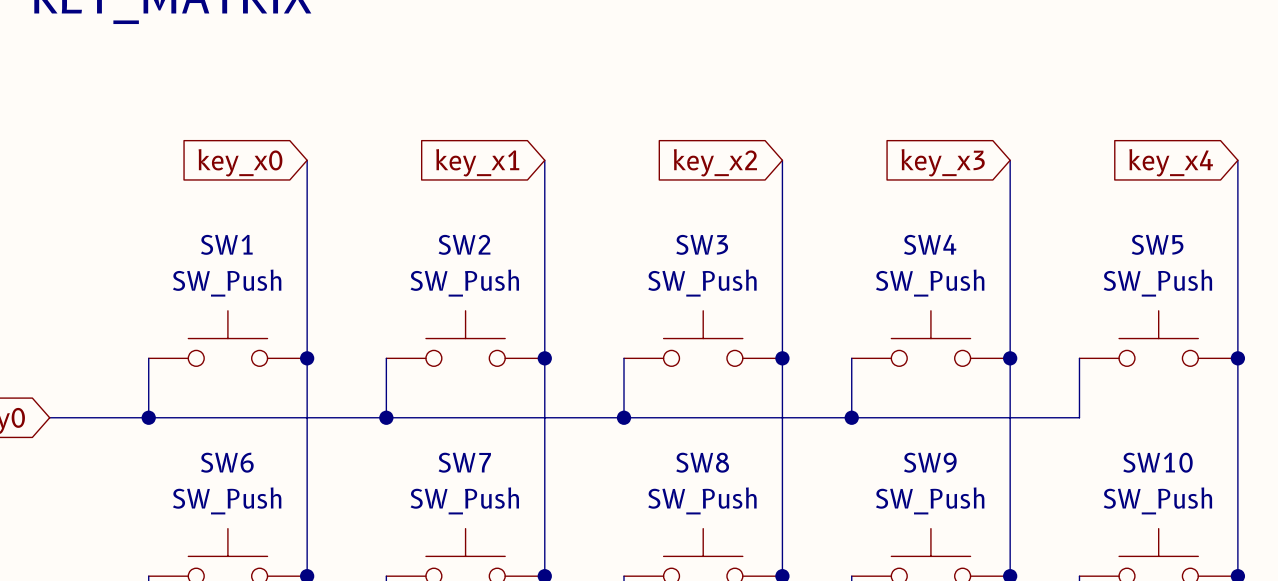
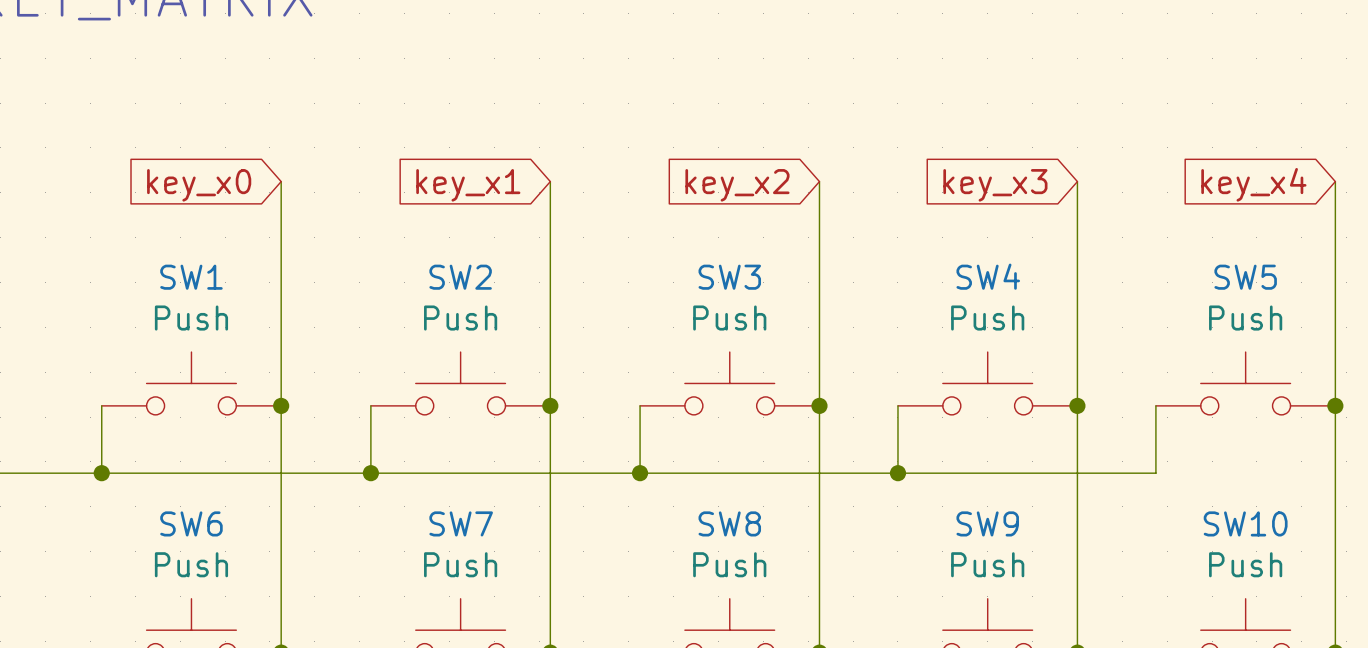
SW1 value: SW_Push (227, 283) -> Push (191, 318)
SW2 value: SW_Push (464, 283) -> Push (460, 318)
SW3 value: SW_Push (702, 283) -> Push (729, 318)
SW4 value: SW_Push (930, 283) -> Push (987, 318)
SW5 value: SW_Push (1157, 283) -> Push (1245, 318)
SW6 value: SW_Push (227, 500) -> Push (191, 564)
SW7 value: SW_Push (464, 500) -> Push (460, 564)
SW8 value: SW_Push (702, 500) -> Push (729, 564)
SW9 value: SW_Push (930, 500) -> Push (987, 564)
SW10 value: SW_Push (1157, 500) -> Push (1245, 564)

